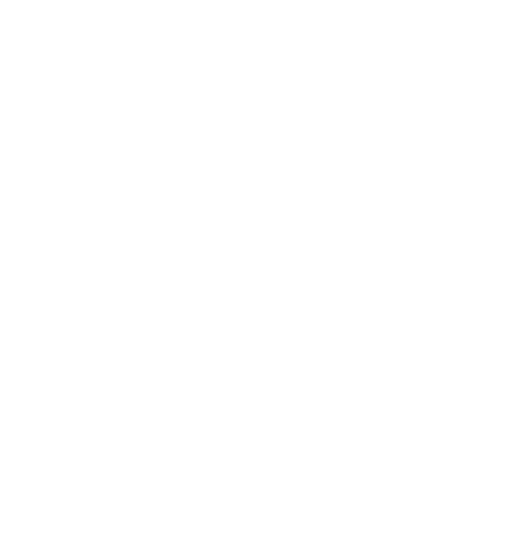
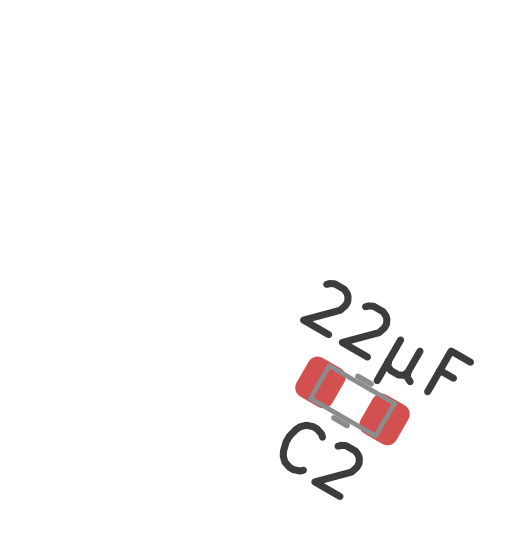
C2: none -> 22μF (352, 400)

